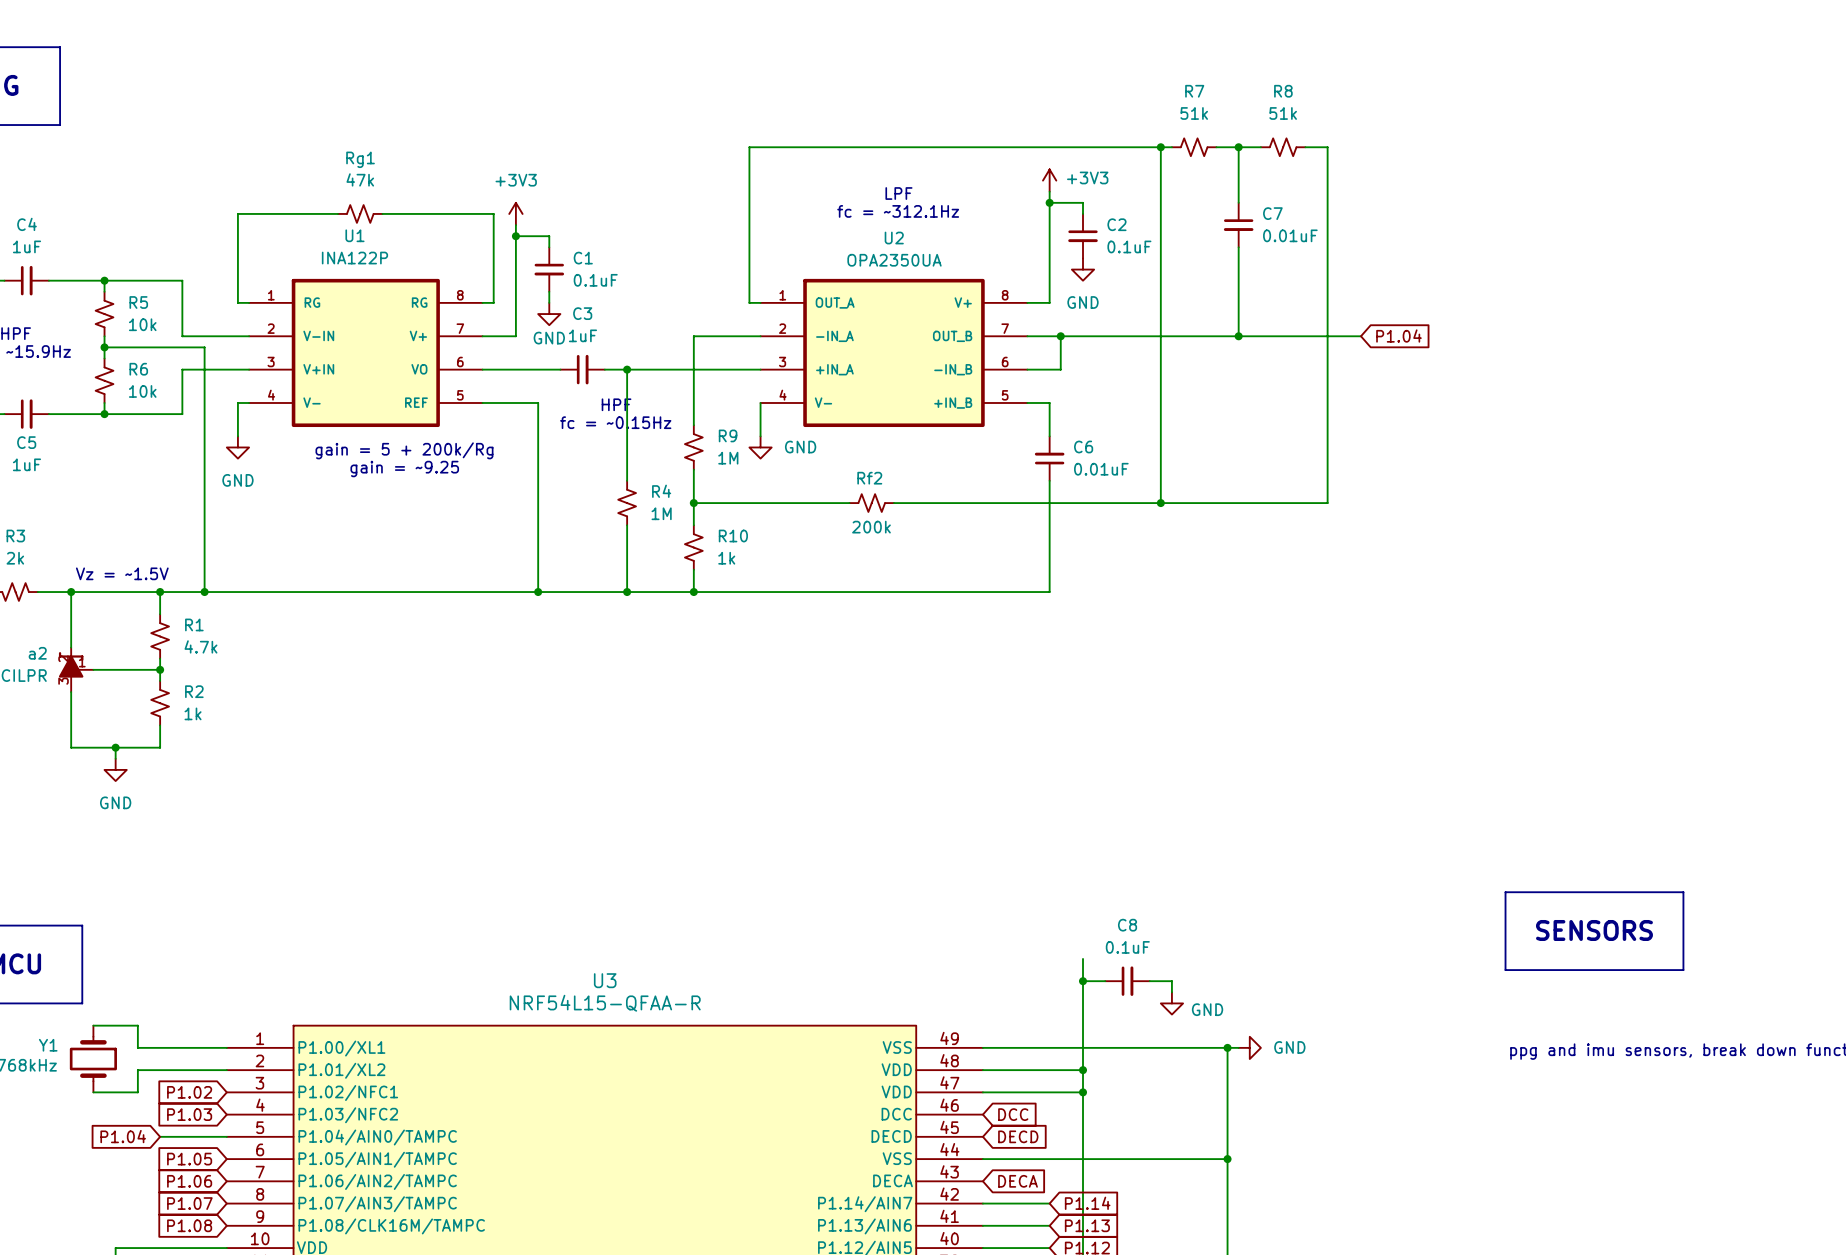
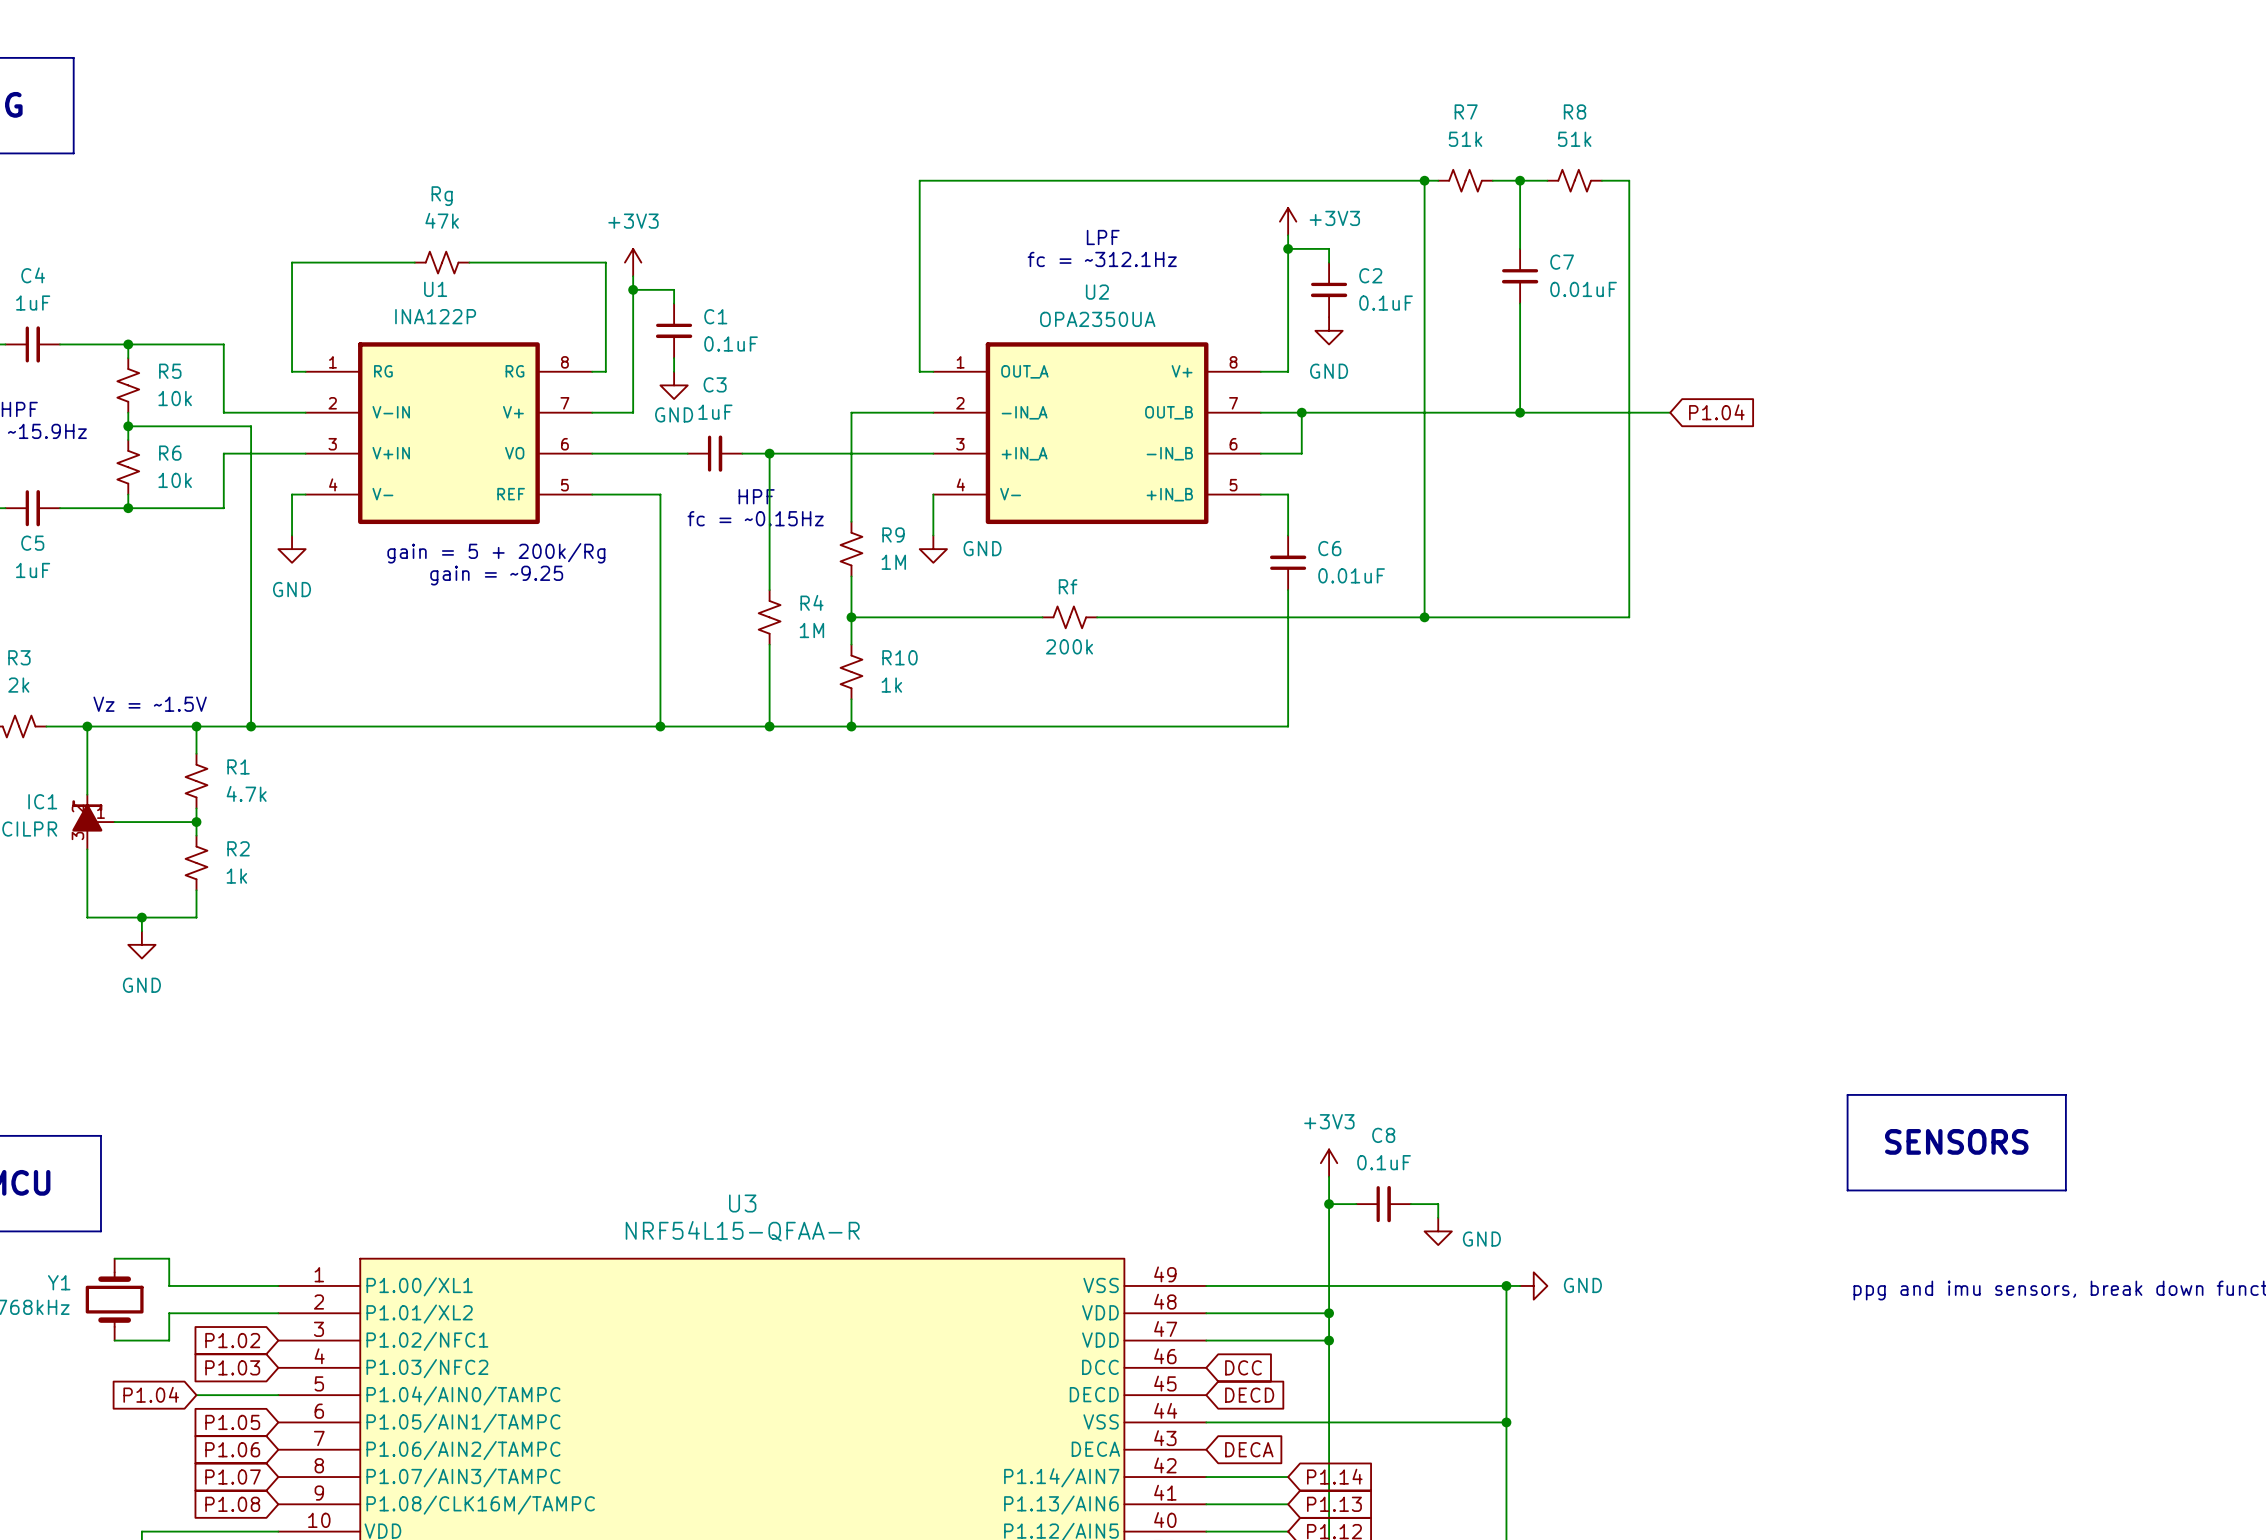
Rg1 name: Rg1 (360, 159) -> Rg (442, 196)
Rf2 name: Rf2 (869, 478) -> Rf (1068, 586)
a2 name: a2 (37, 653) -> IC1 (42, 801)
power symbol: none -> +3V3 (1329, 1163)

